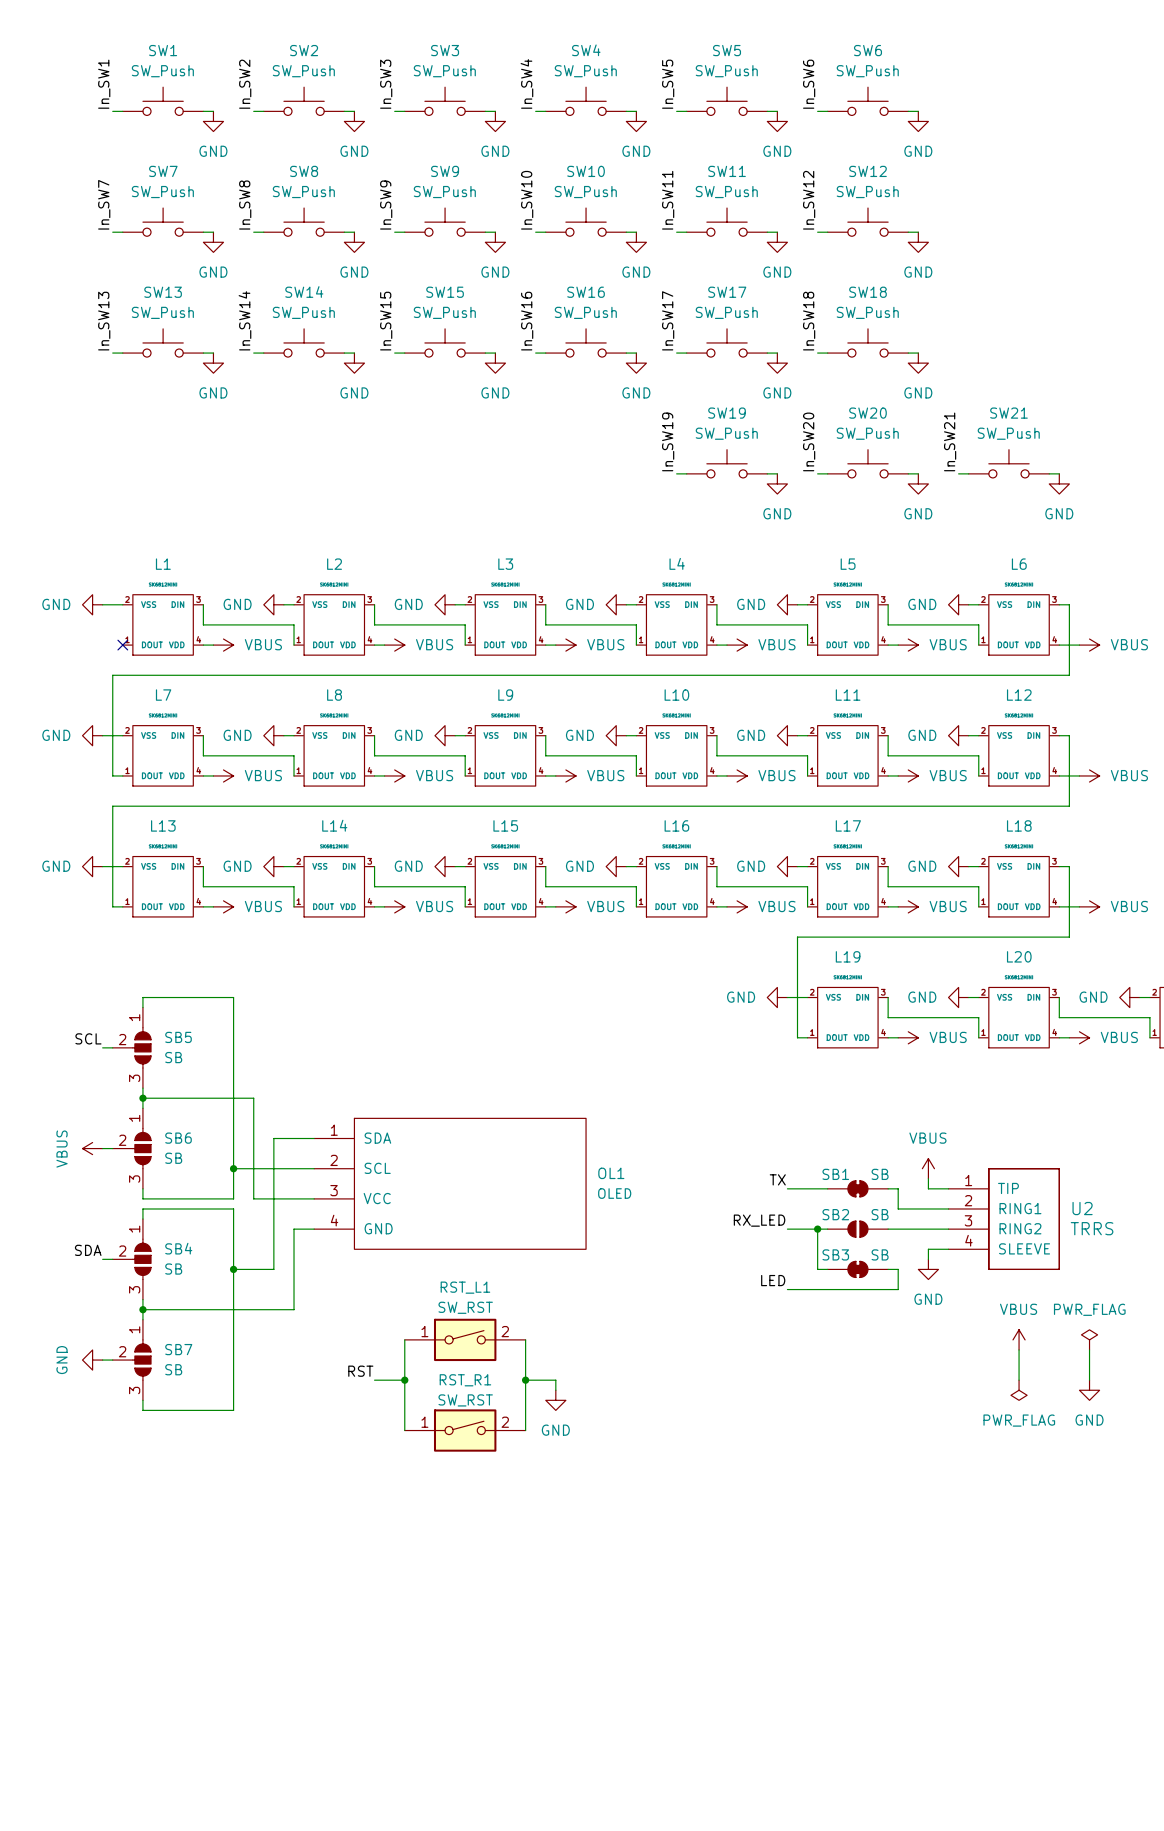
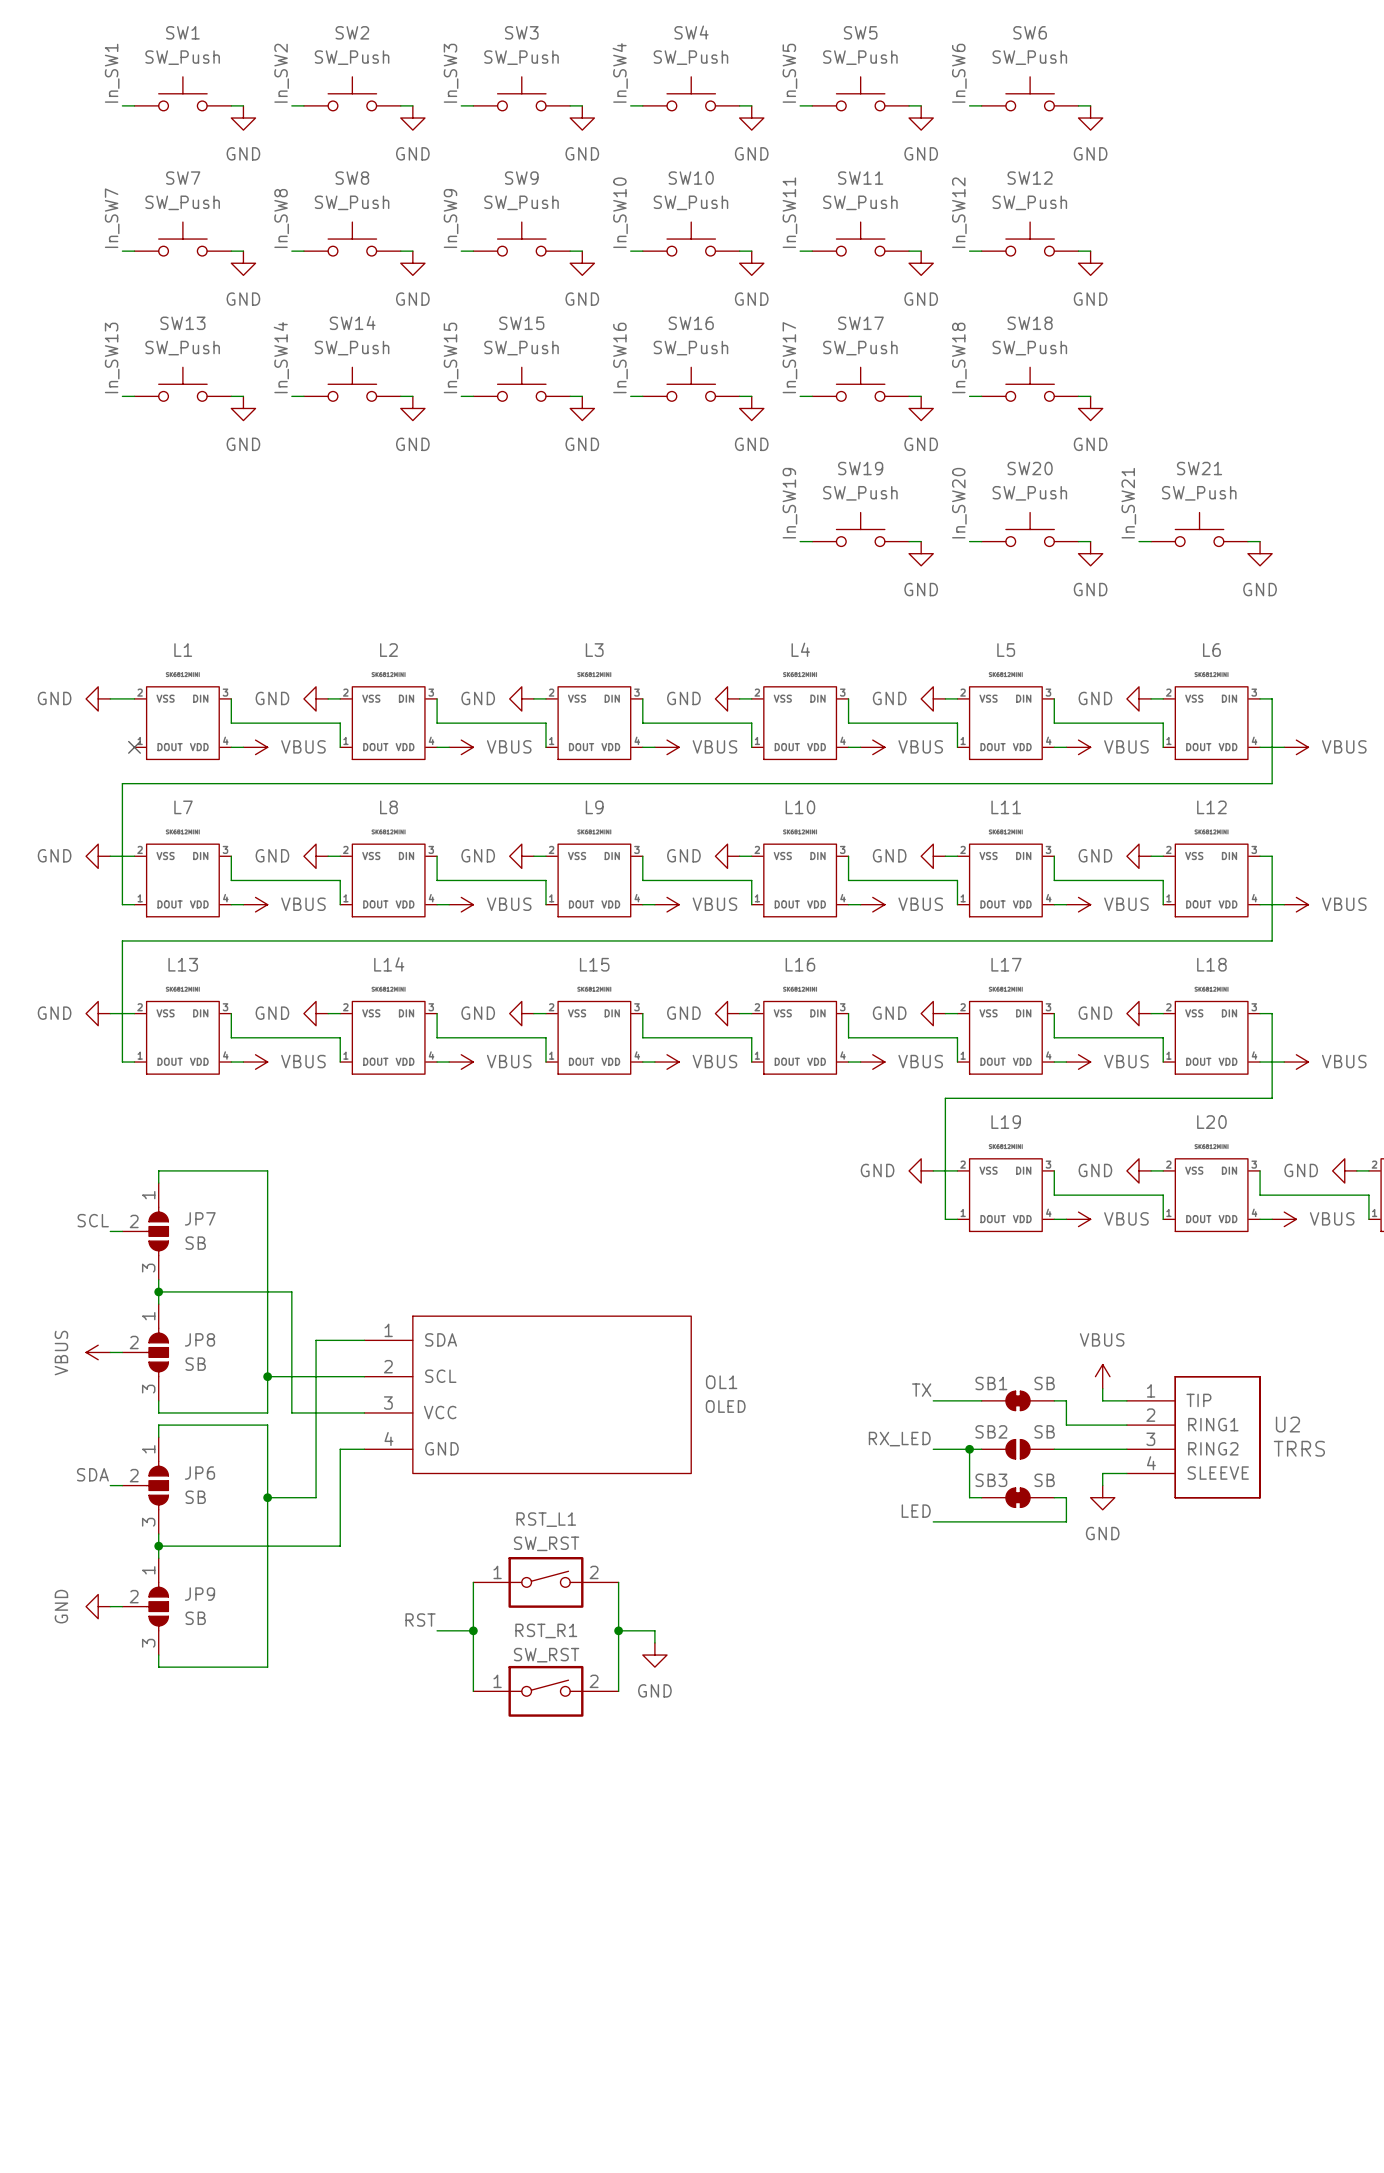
SB5 name: SB5 (178, 1037) -> JP7 (200, 1218)
SB6 name: SB6 (178, 1138) -> JP8 (200, 1339)
SB4 name: SB4 (178, 1248) -> JP6 (200, 1473)
power symbol: VBUS (1019, 1339) -> none
power symbol: PWR_FLAG (1089, 1339) -> none
SB7 name: SB7 (178, 1349) -> JP9 (200, 1594)
wire: (1019, 1349) (1019, 1380) -> none
wire: (1089, 1349) (1089, 1380) -> none
power symbol: PWR_FLAG (1019, 1390) -> none
power symbol: GND (1089, 1390) -> none

